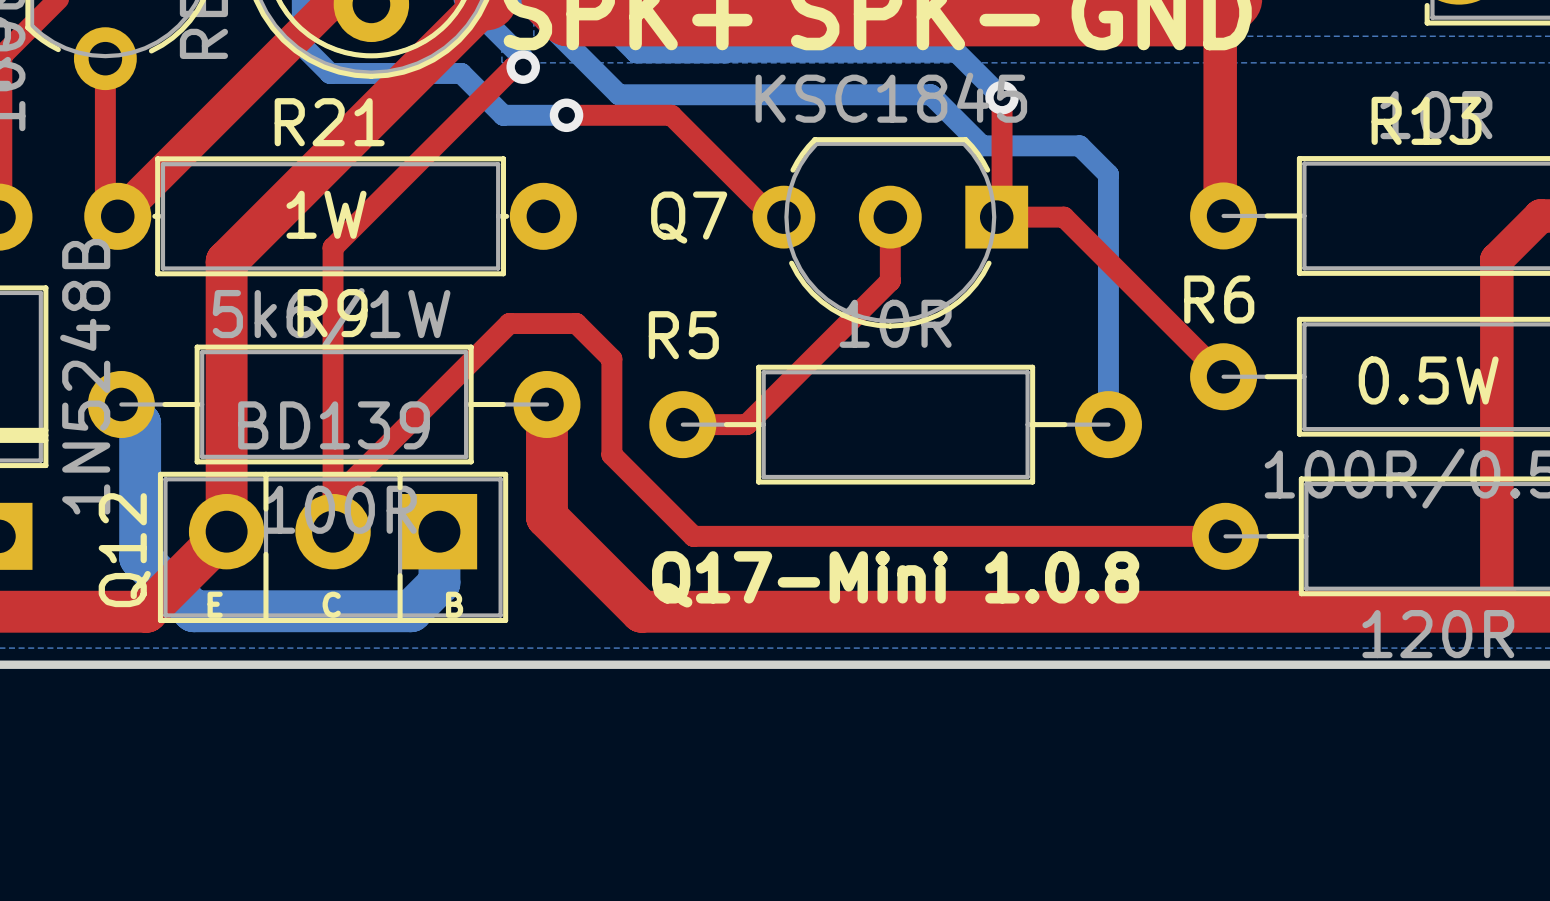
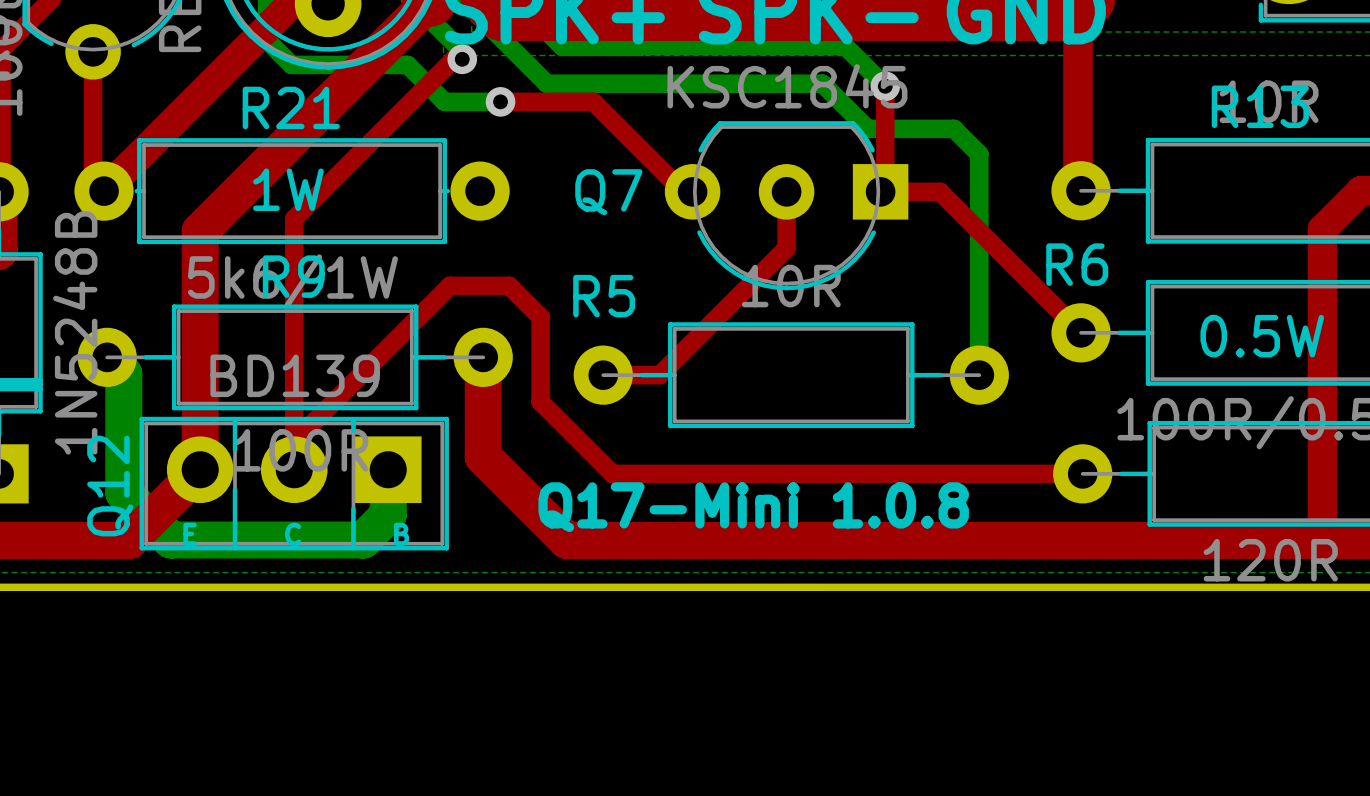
text position: Q17-Mini 1.0.8 (895, 579) -> Q17-Mini 1.0.8 (753, 507)

